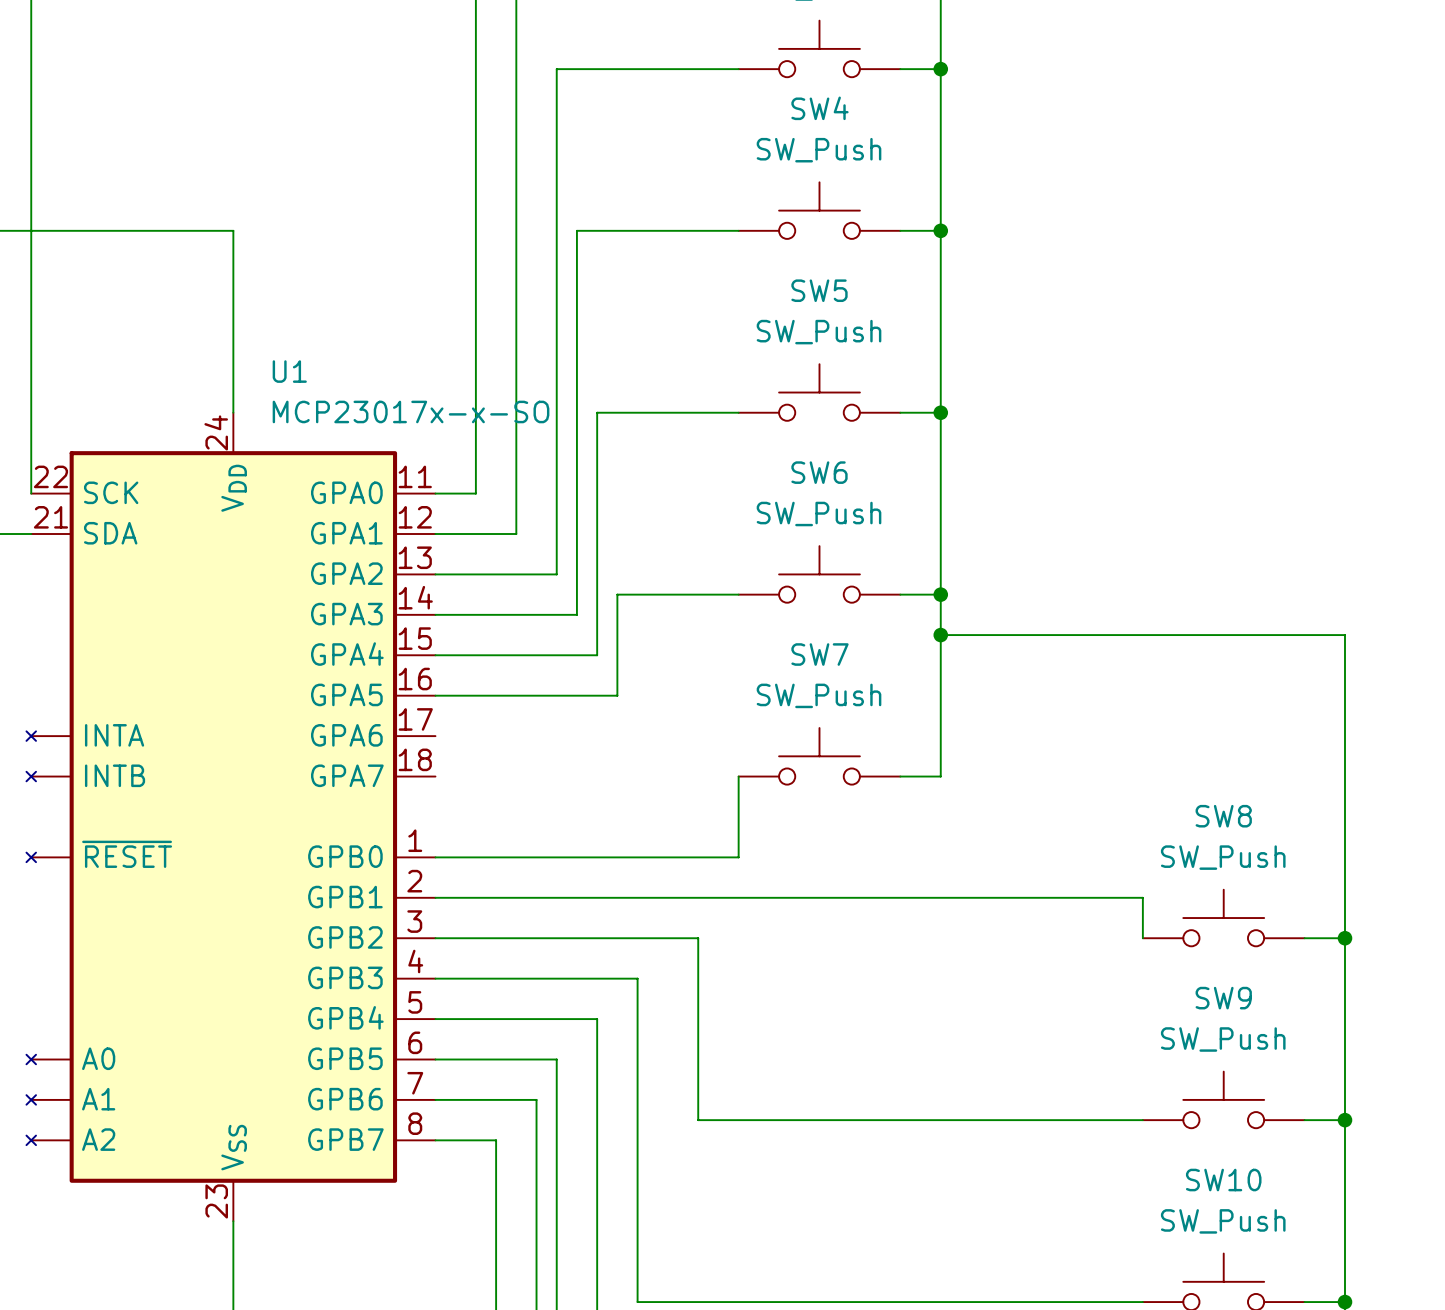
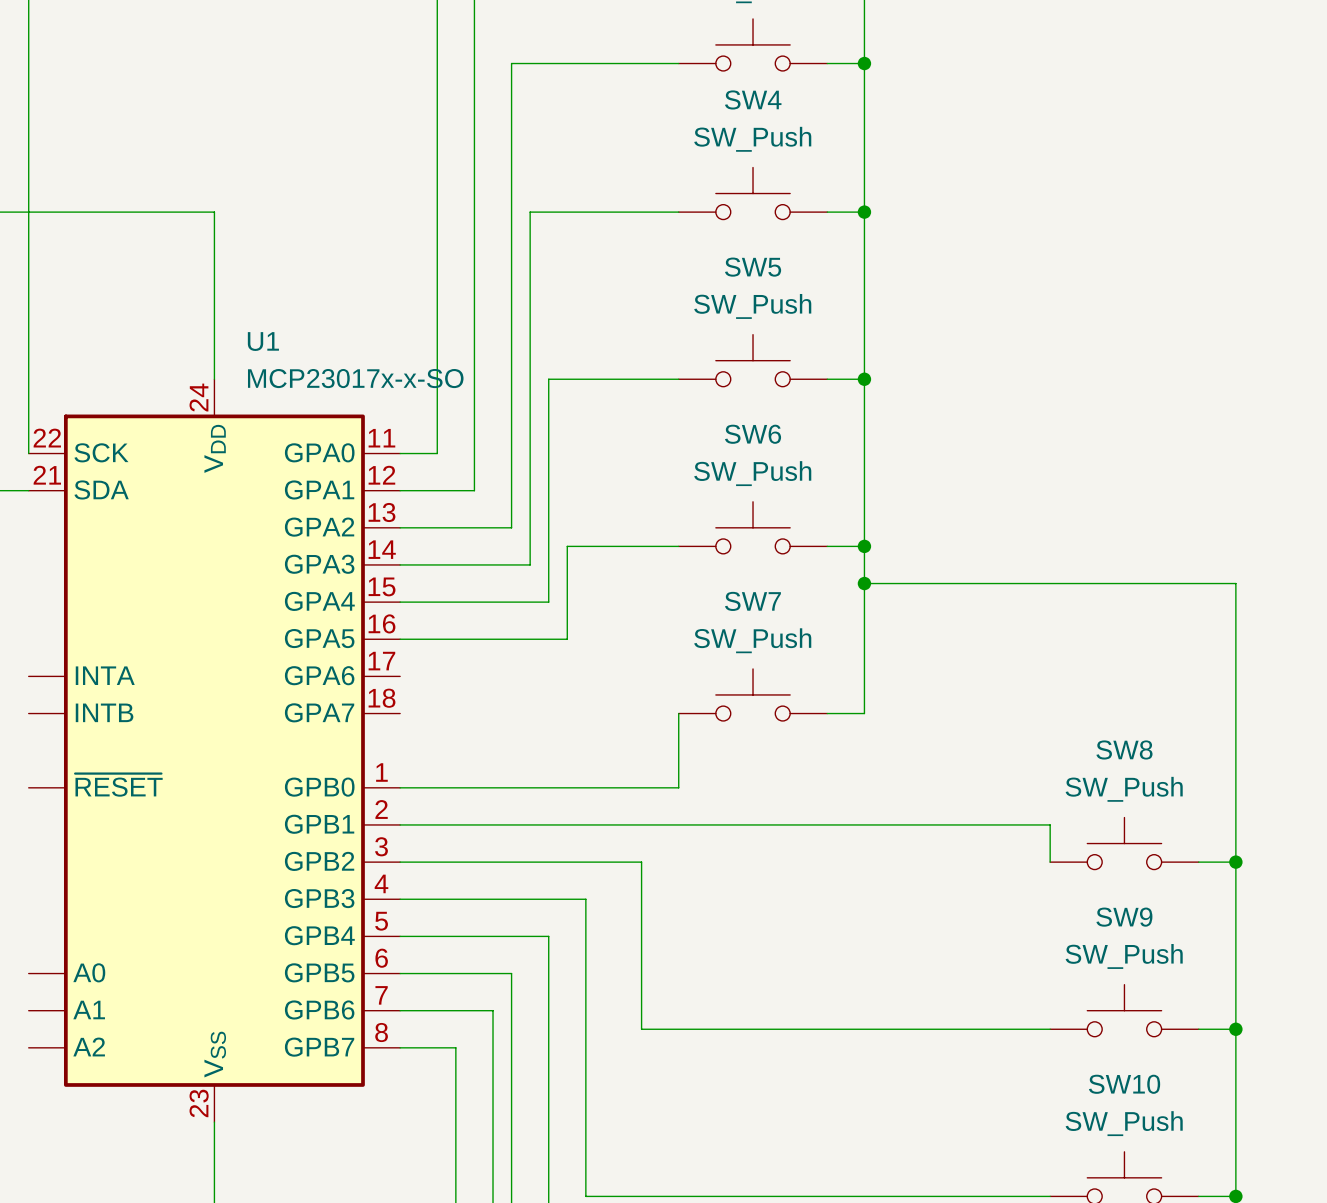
U1 symbol: [26, 412, 436, 1222] -> [28, 379, 401, 1123]

